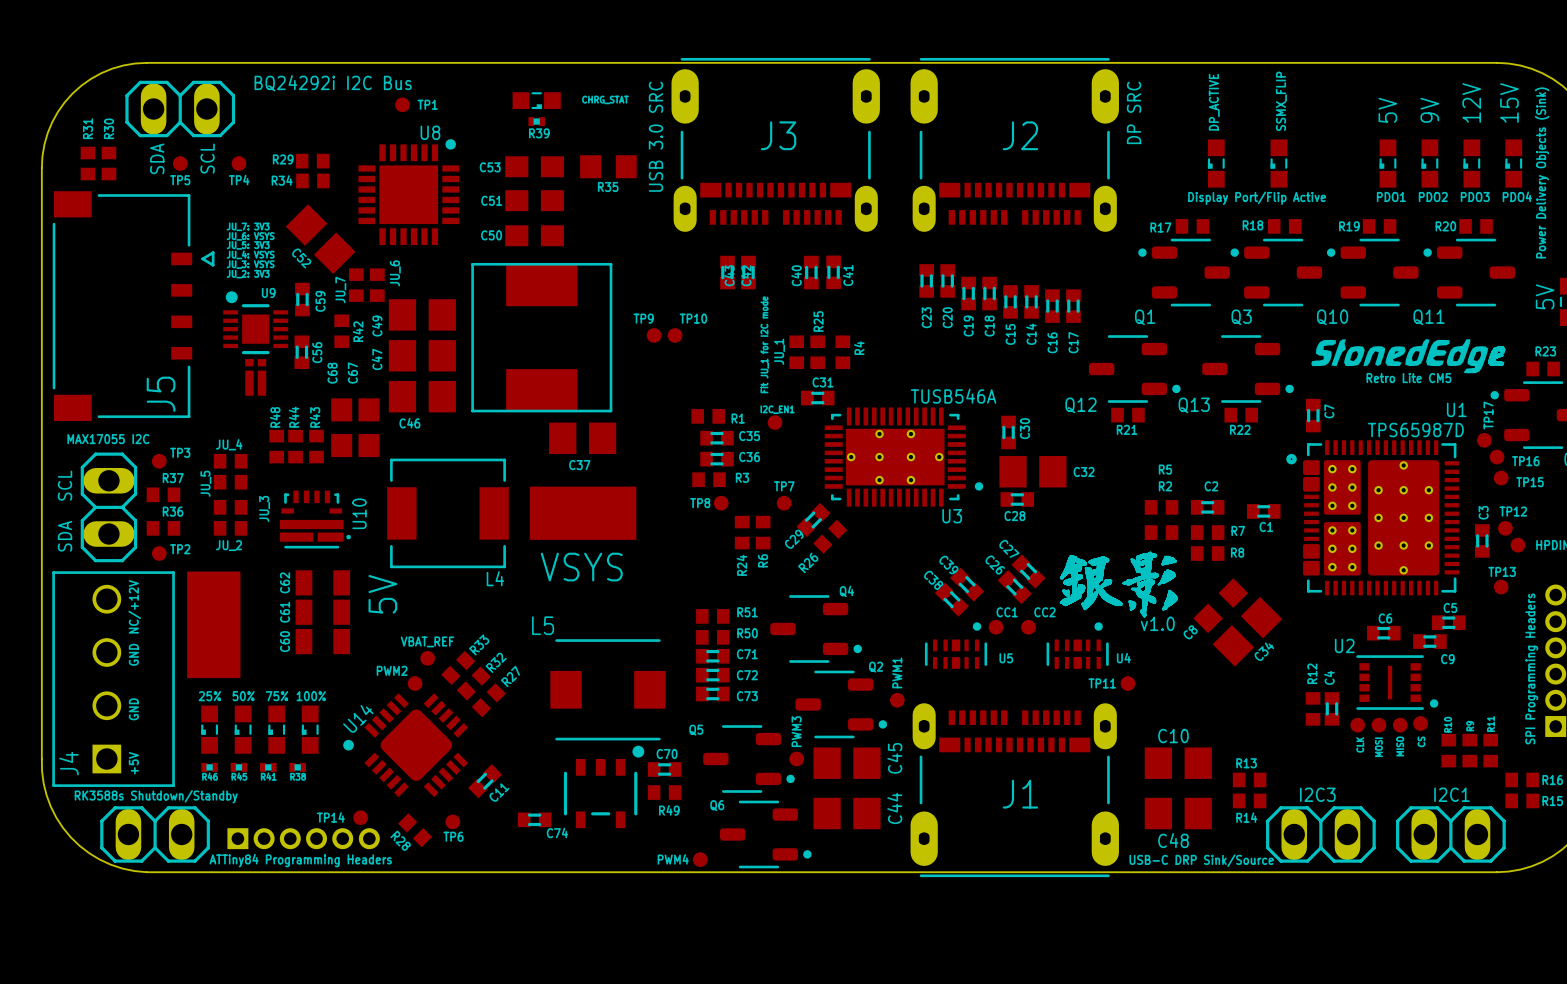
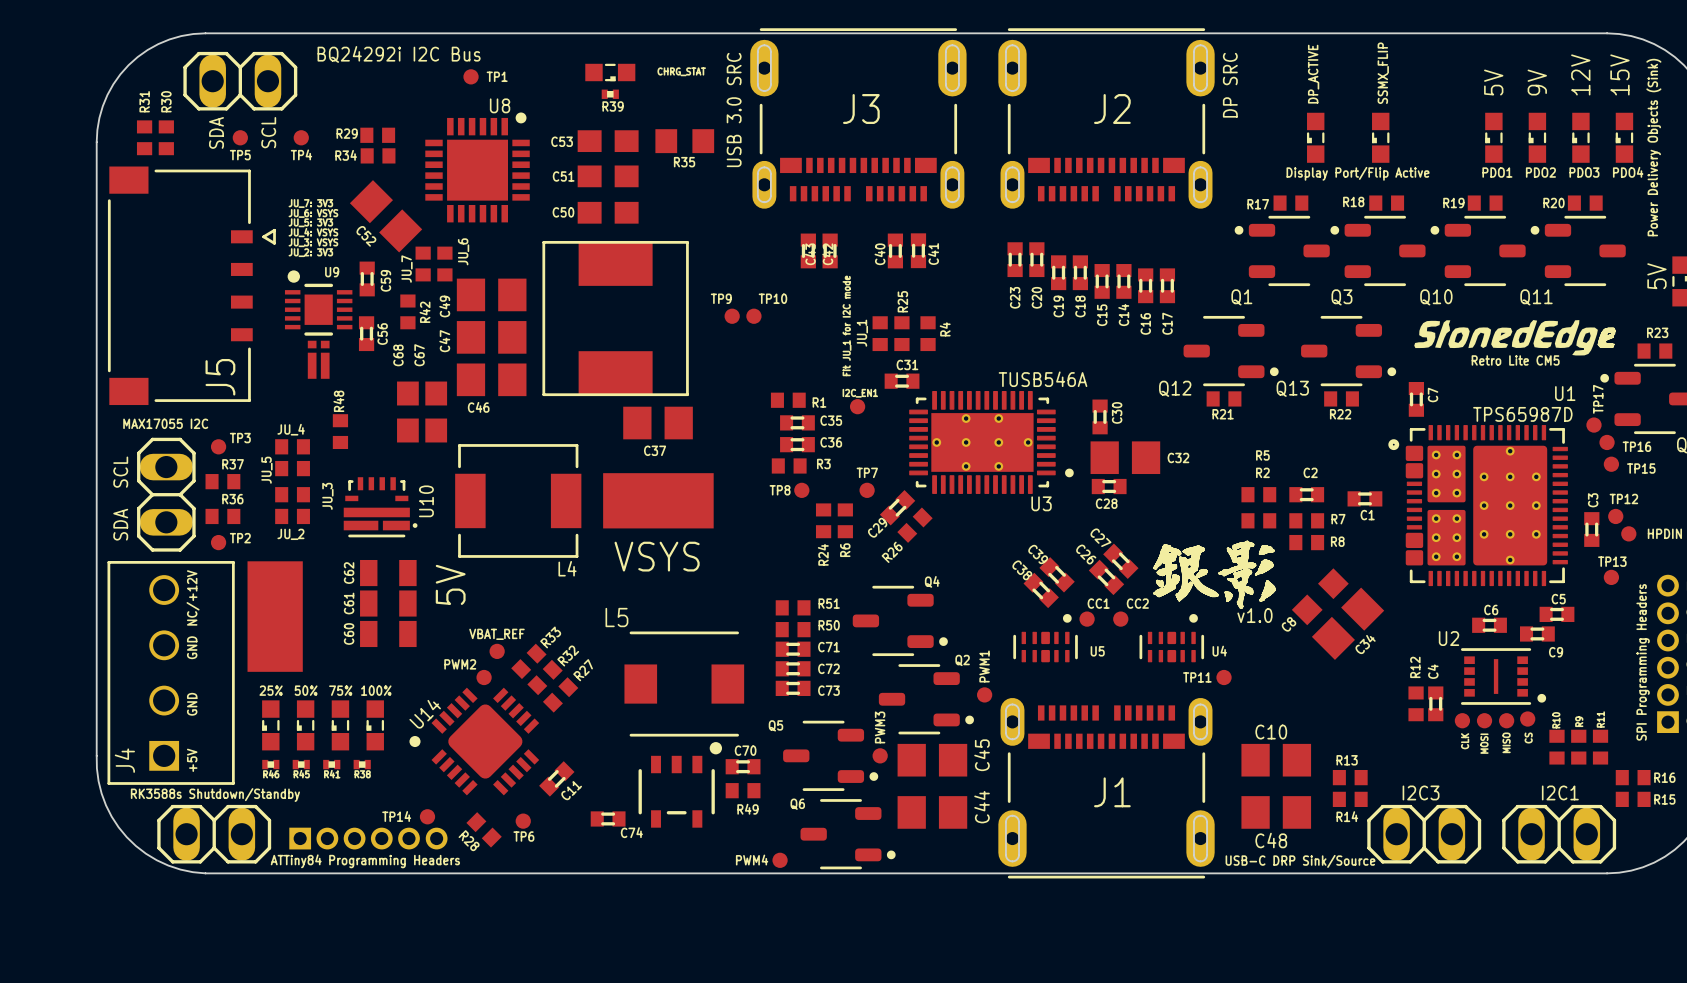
R44: (295, 446) -> none
R43: (316, 446) -> none

